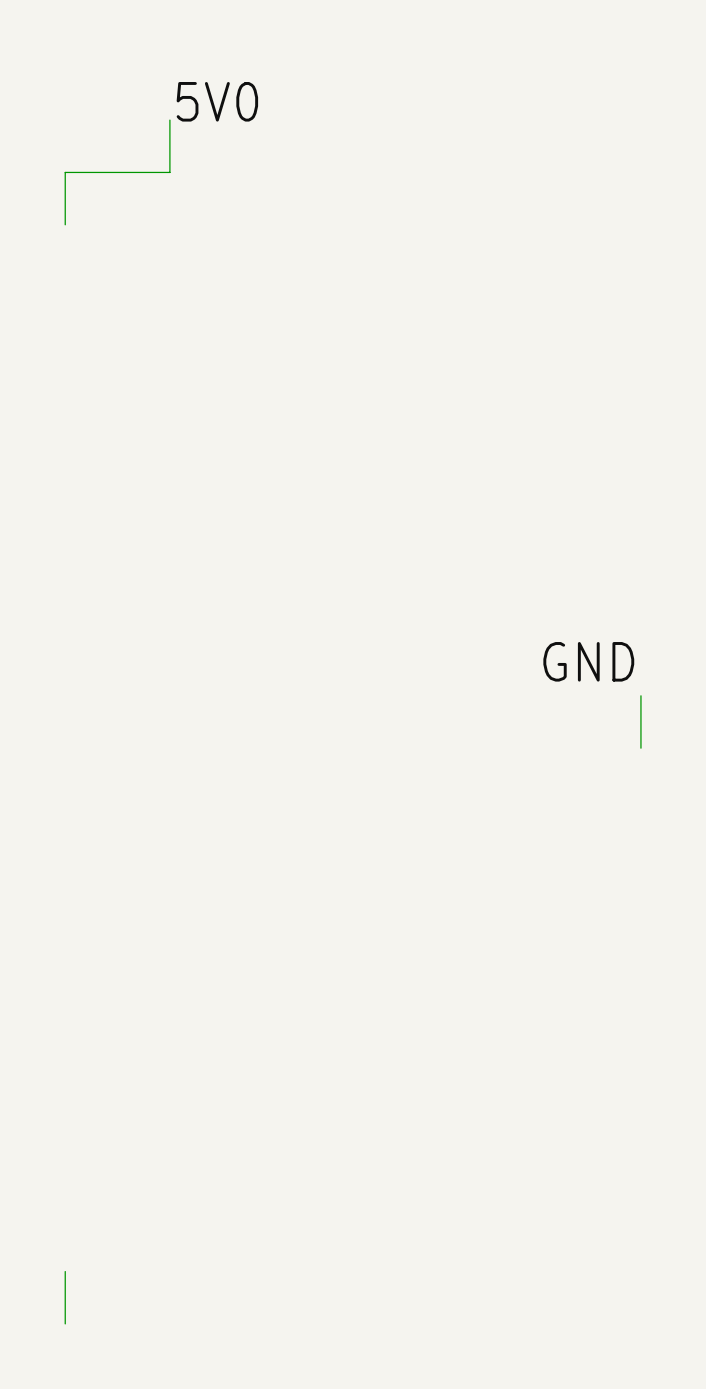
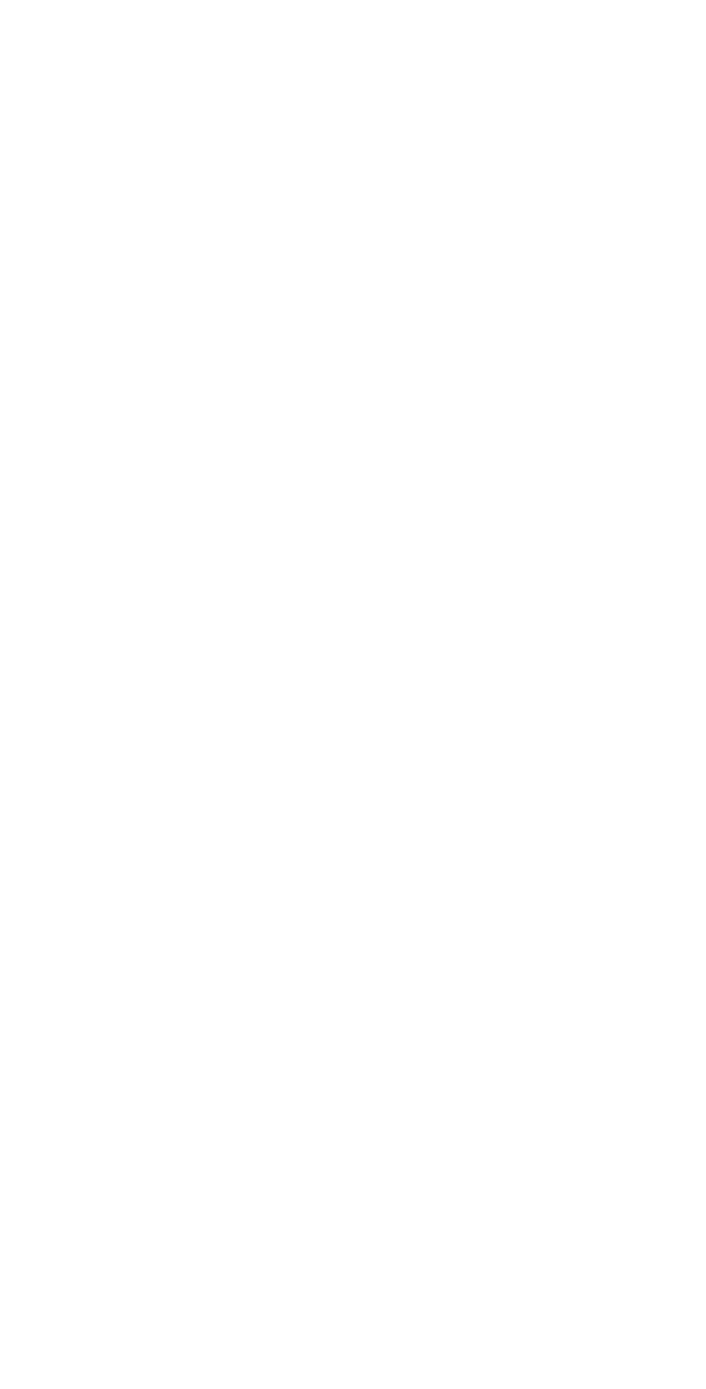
label: 5V0 (217, 101) -> none
wire: (169, 120) (169, 172) (65, 172) (65, 224) -> none
label: GND (588, 661) -> none
wire: (640, 695) (640, 748) -> none
wire: (65, 1271) (65, 1323) -> none

